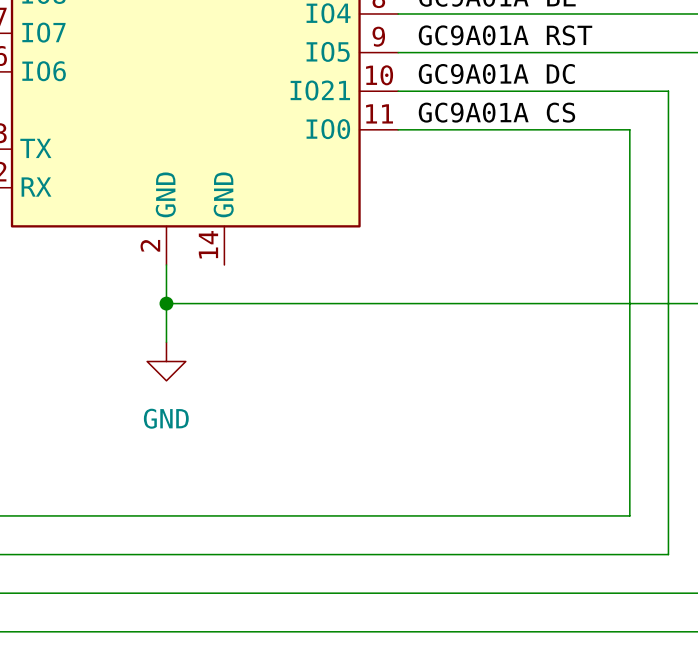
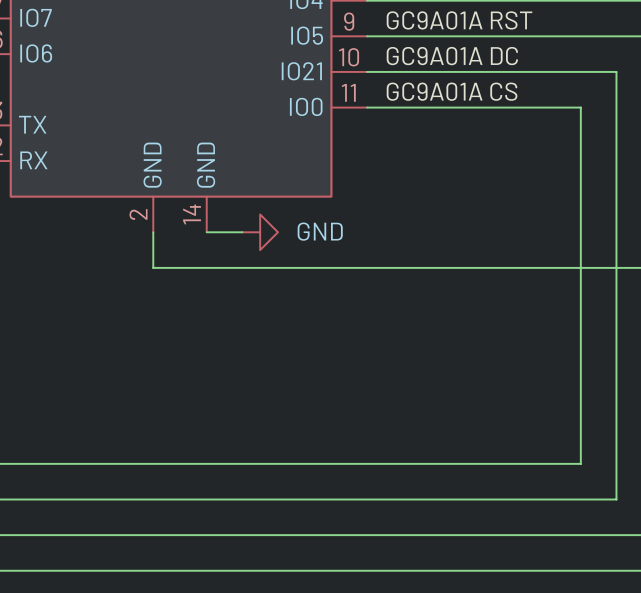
wire: none -> (206, 232) (242, 232)
wire: (166, 303) (166, 342) -> none
junction: (166, 303) -> none
power symbol rotation: 0° (166, 361) -> 90° counterclockwise (260, 232)
power symbol position: GND (166, 361) -> GND (260, 232)

